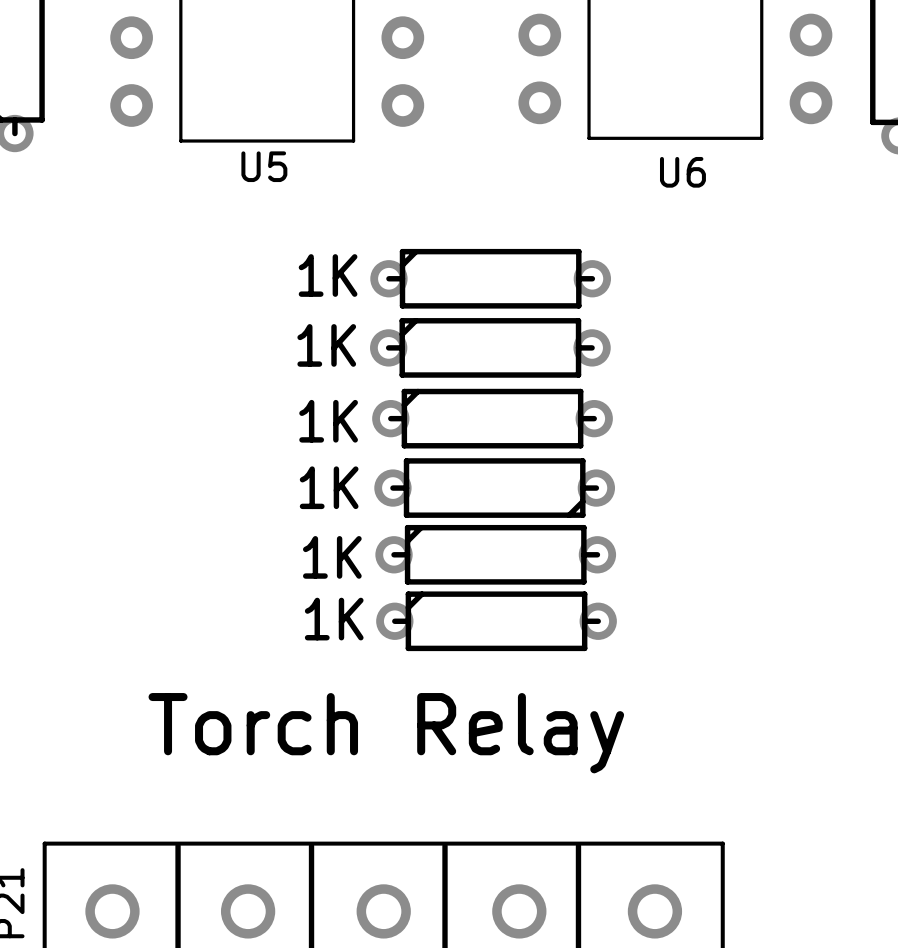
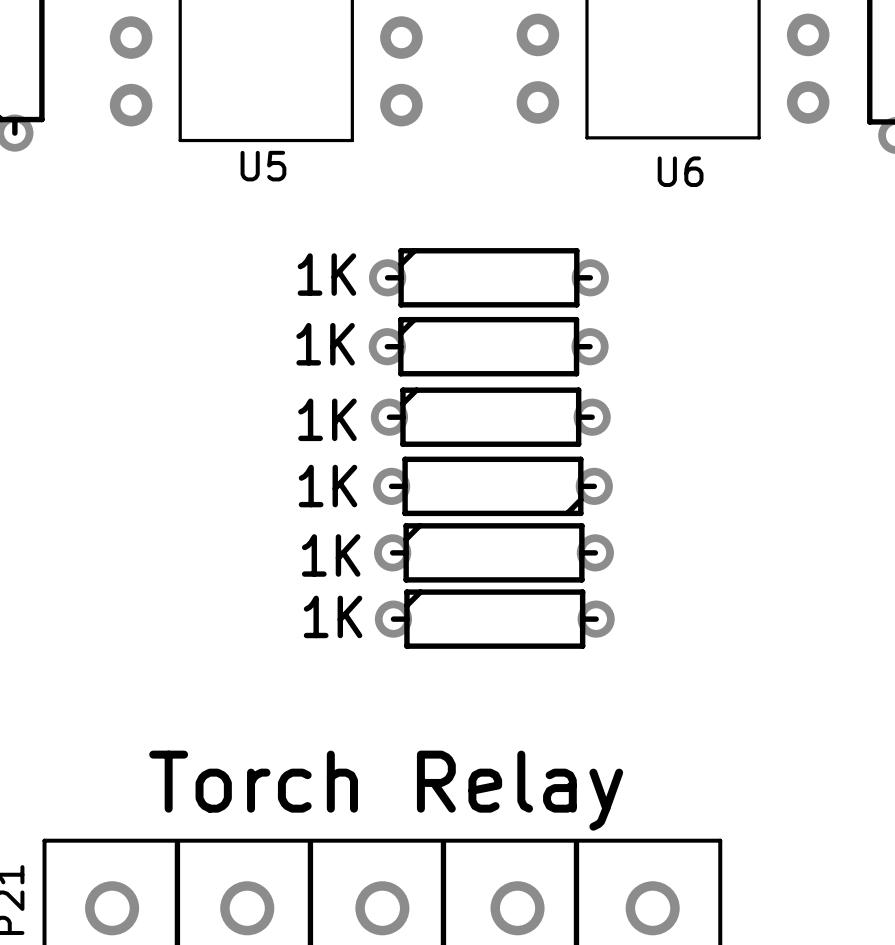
text position: Torch Relay (386, 733) -> Torch Relay (386, 790)

